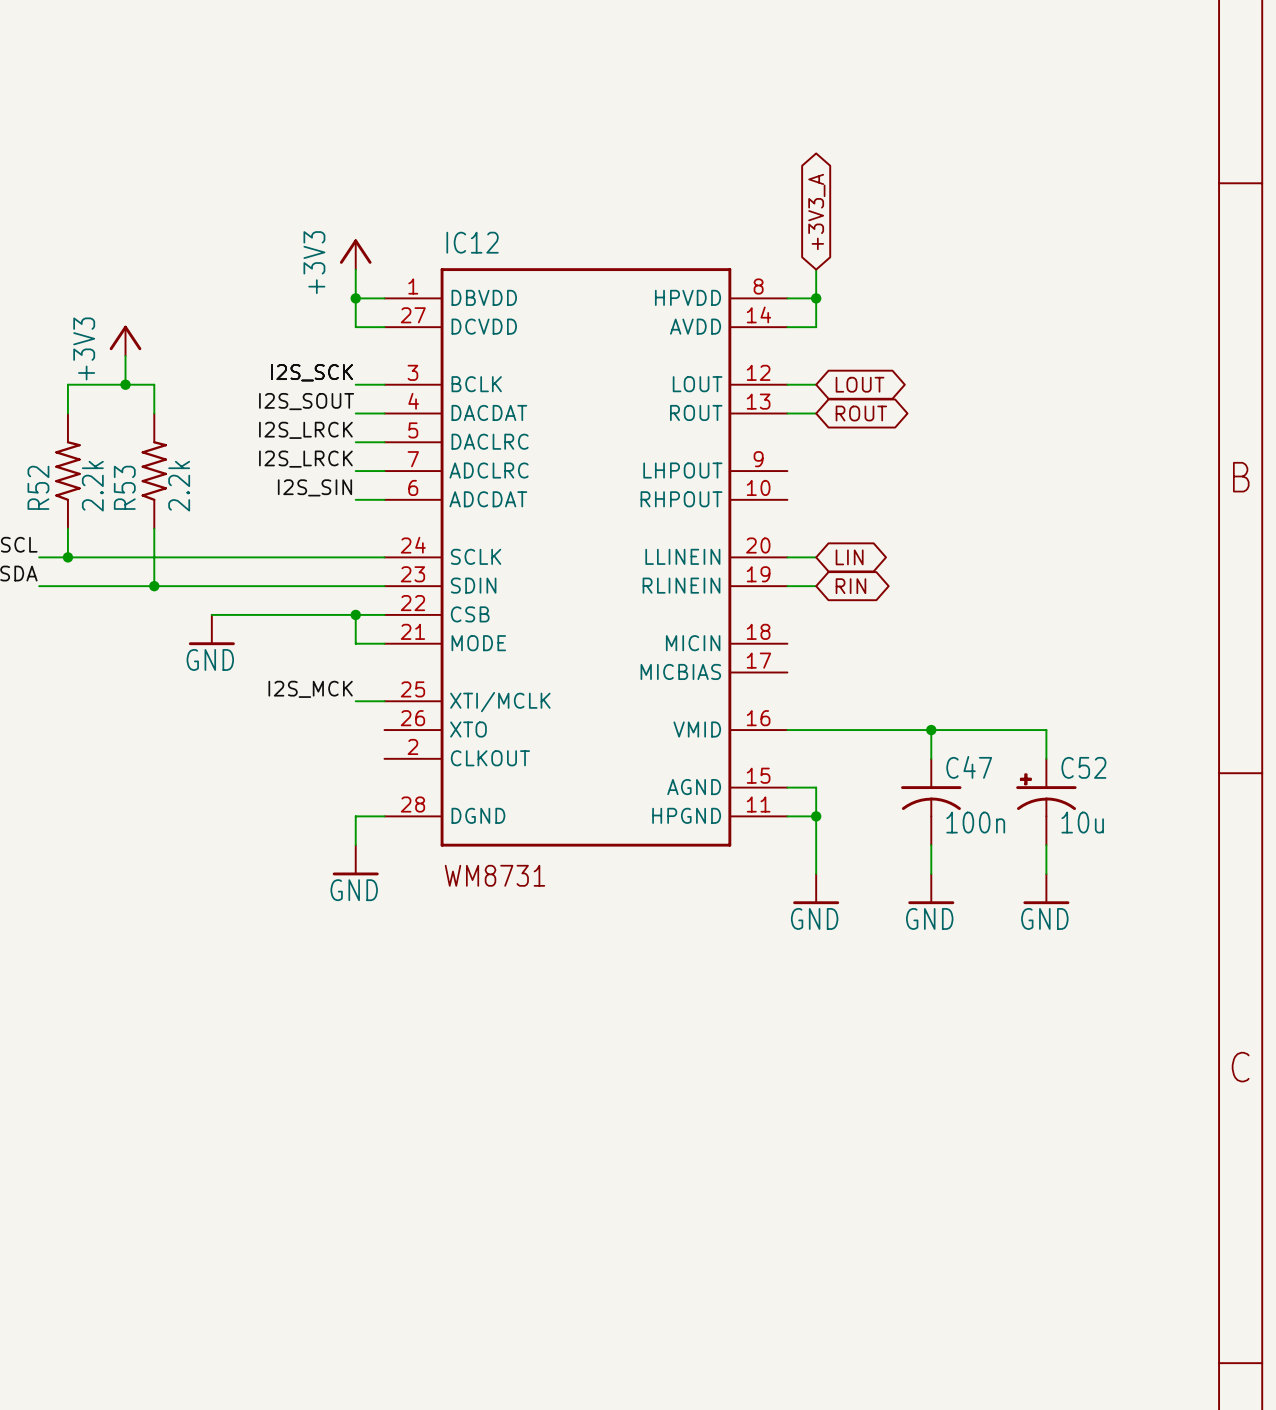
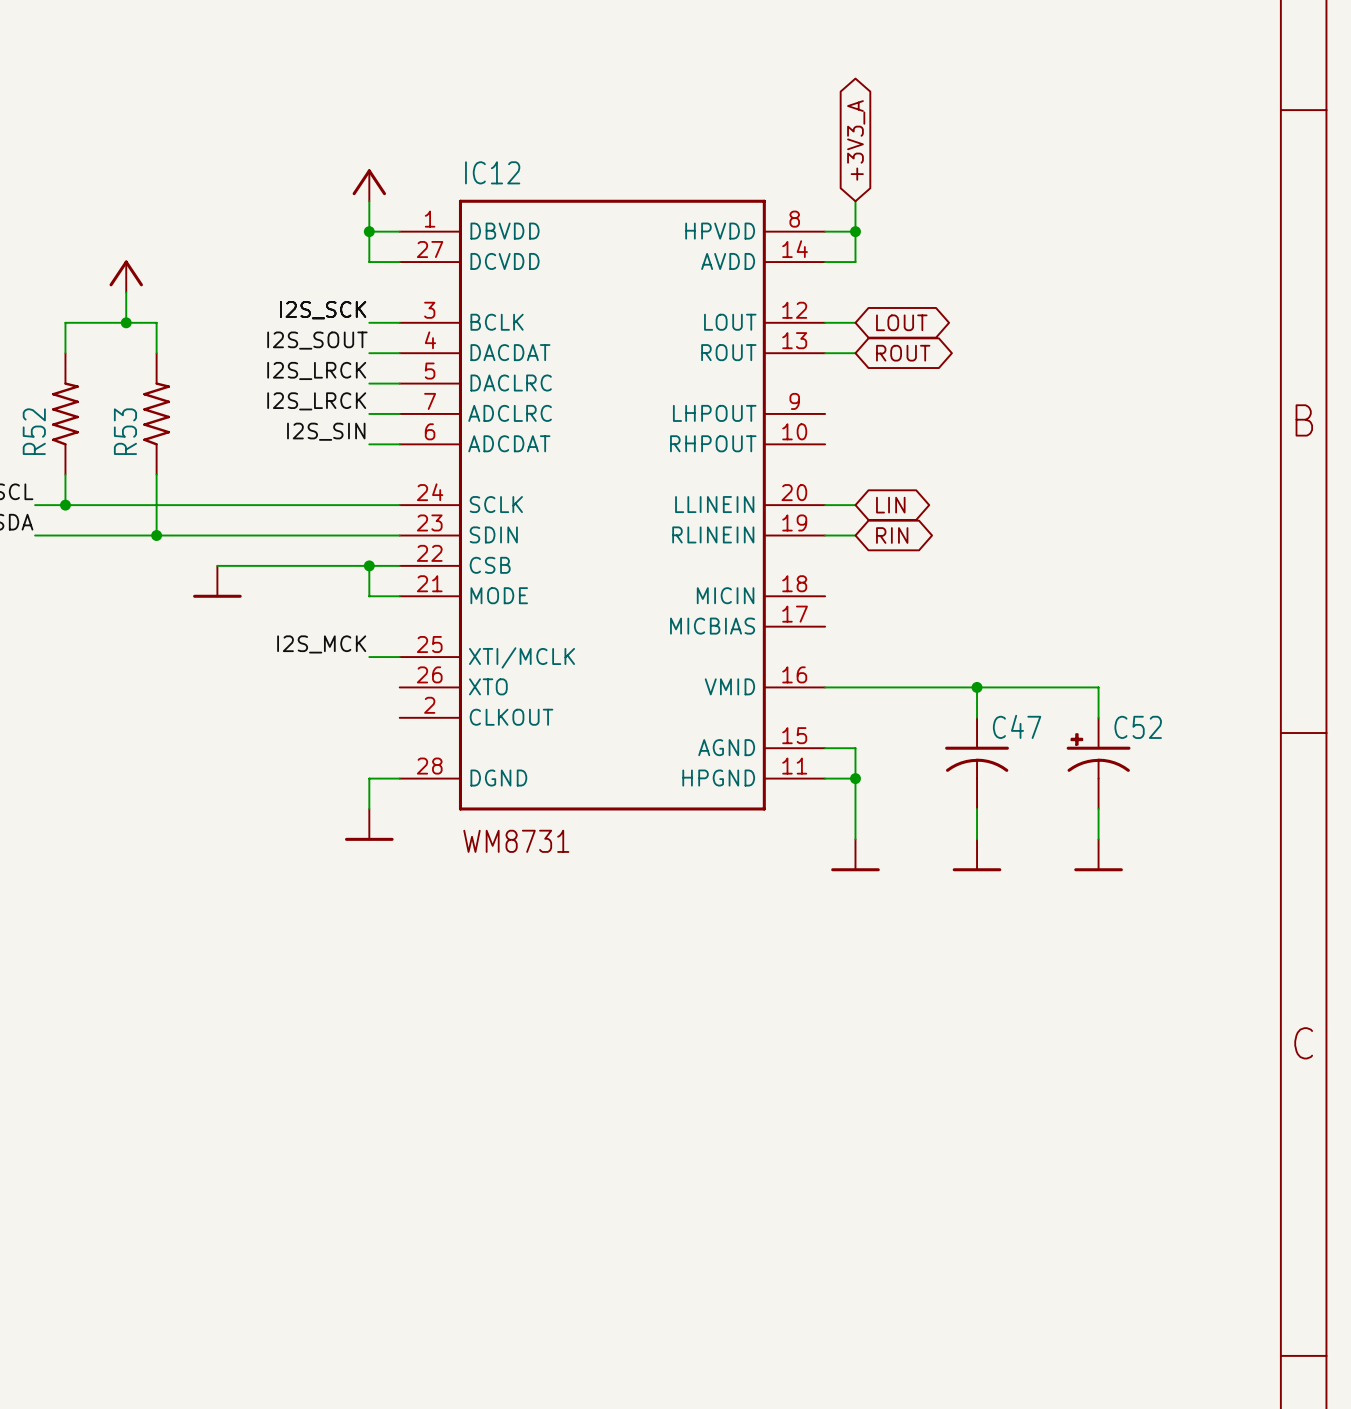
power symbol text: +3V3 (314, 262) -> none
power symbol text: +3V3 (84, 348) -> none
R52 value: 2.2k (92, 486) -> none
R53 value: 2.2k (179, 486) -> none
power symbol text: GND (210, 659) -> none
C47 value: 100n (975, 822) -> none
C52 value: 10u (1082, 822) -> none
power symbol text: GND (354, 890) -> none
power symbol text: GND (814, 918) -> none
power symbol text: GND (929, 918) -> none
power symbol text: GND (1044, 918) -> none

